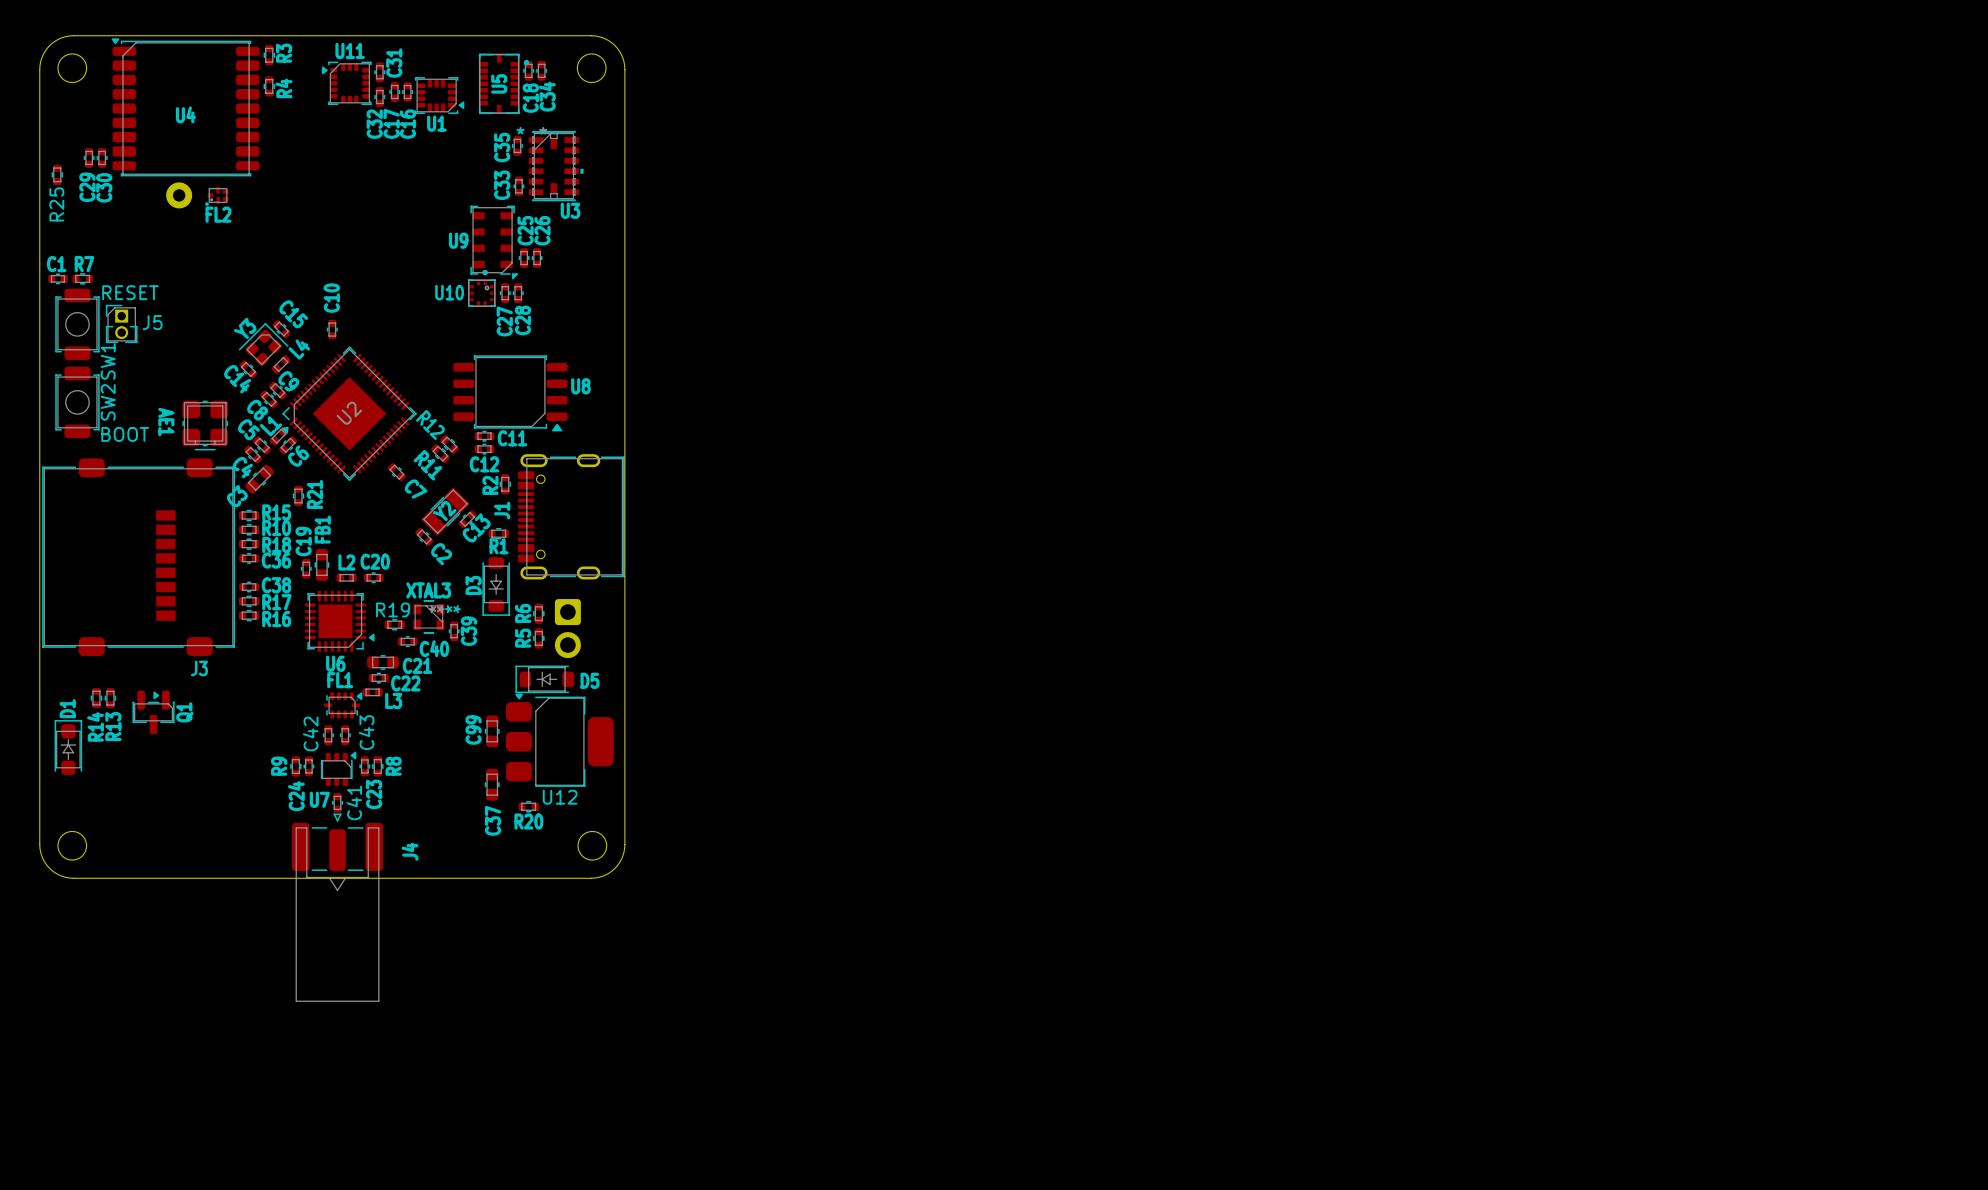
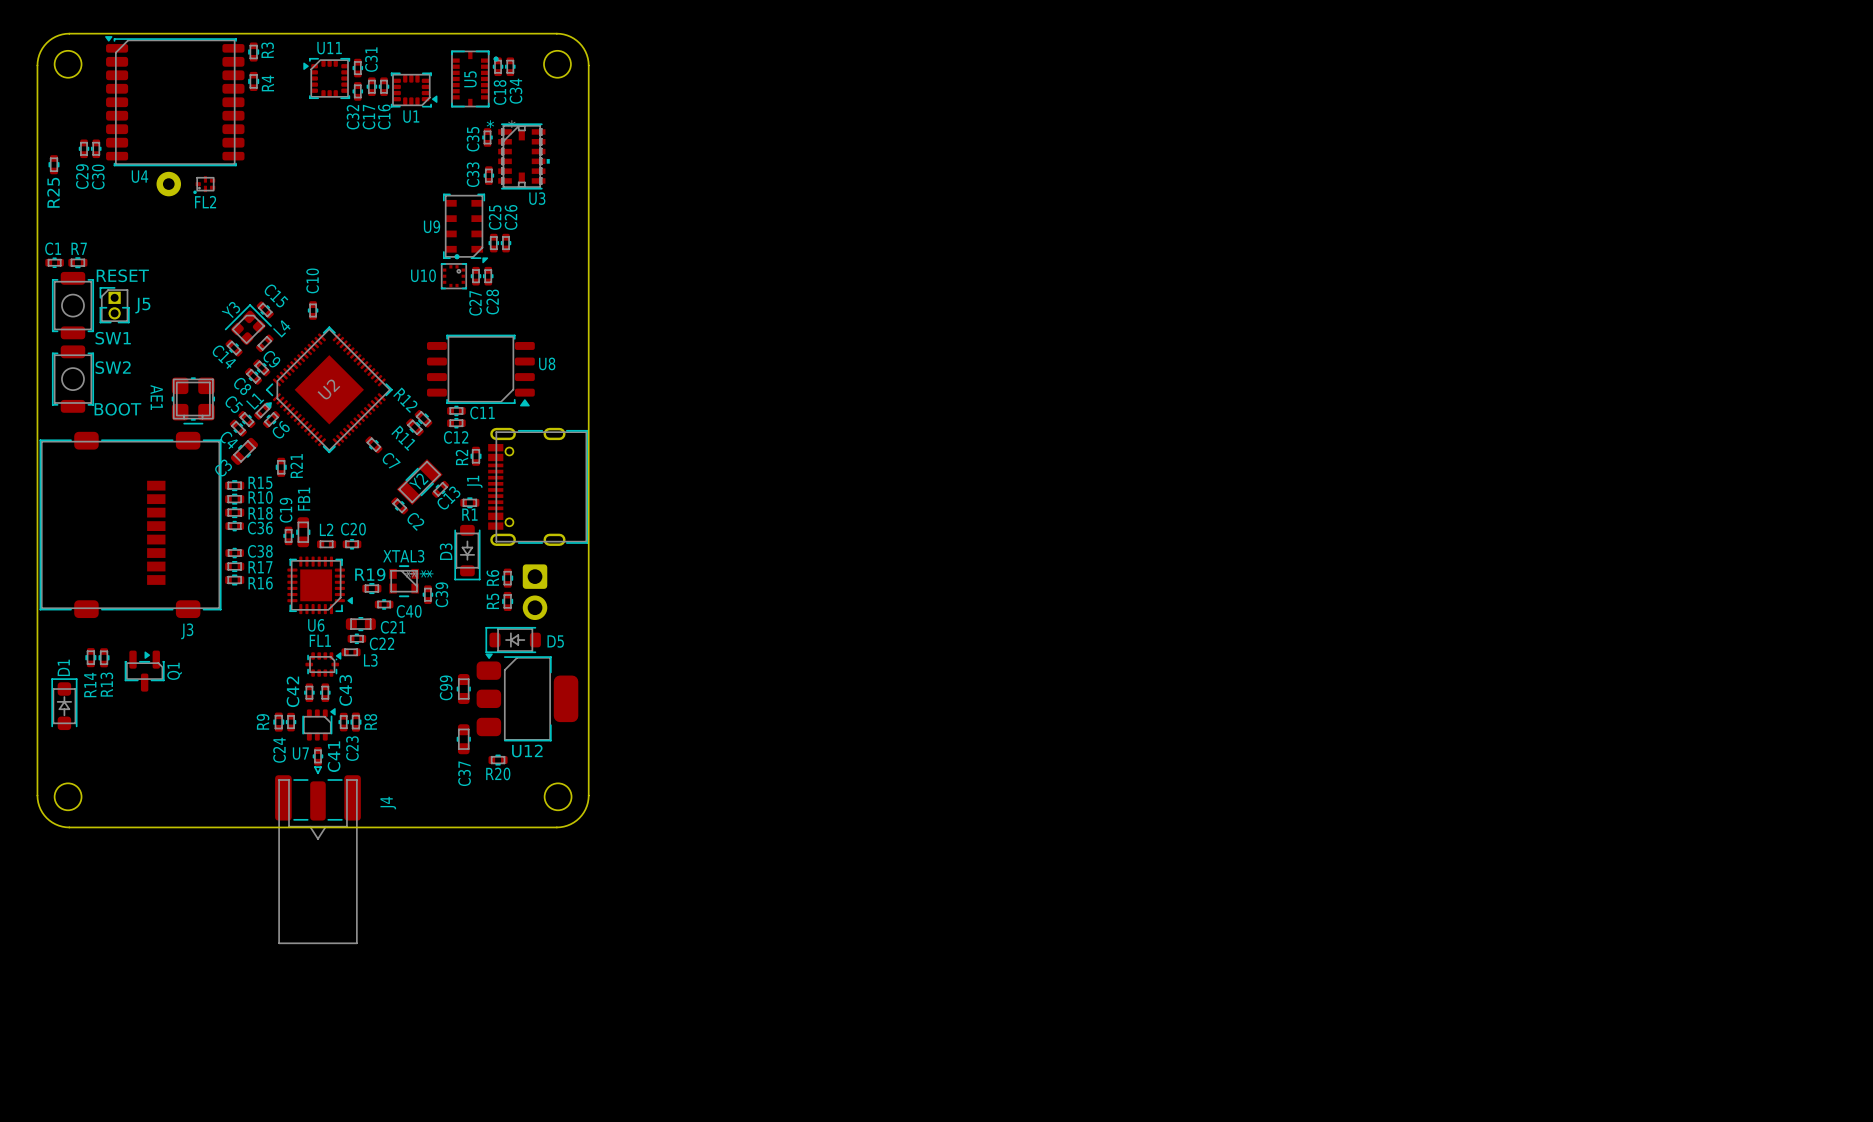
U4 name position: U4 (185, 114) -> U4 (139, 176)
SW1 name rotation: 0° (108, 361) -> 90° clockwise (113, 338)
SW2 name rotation: 0° (108, 402) -> 90° clockwise (113, 367)

